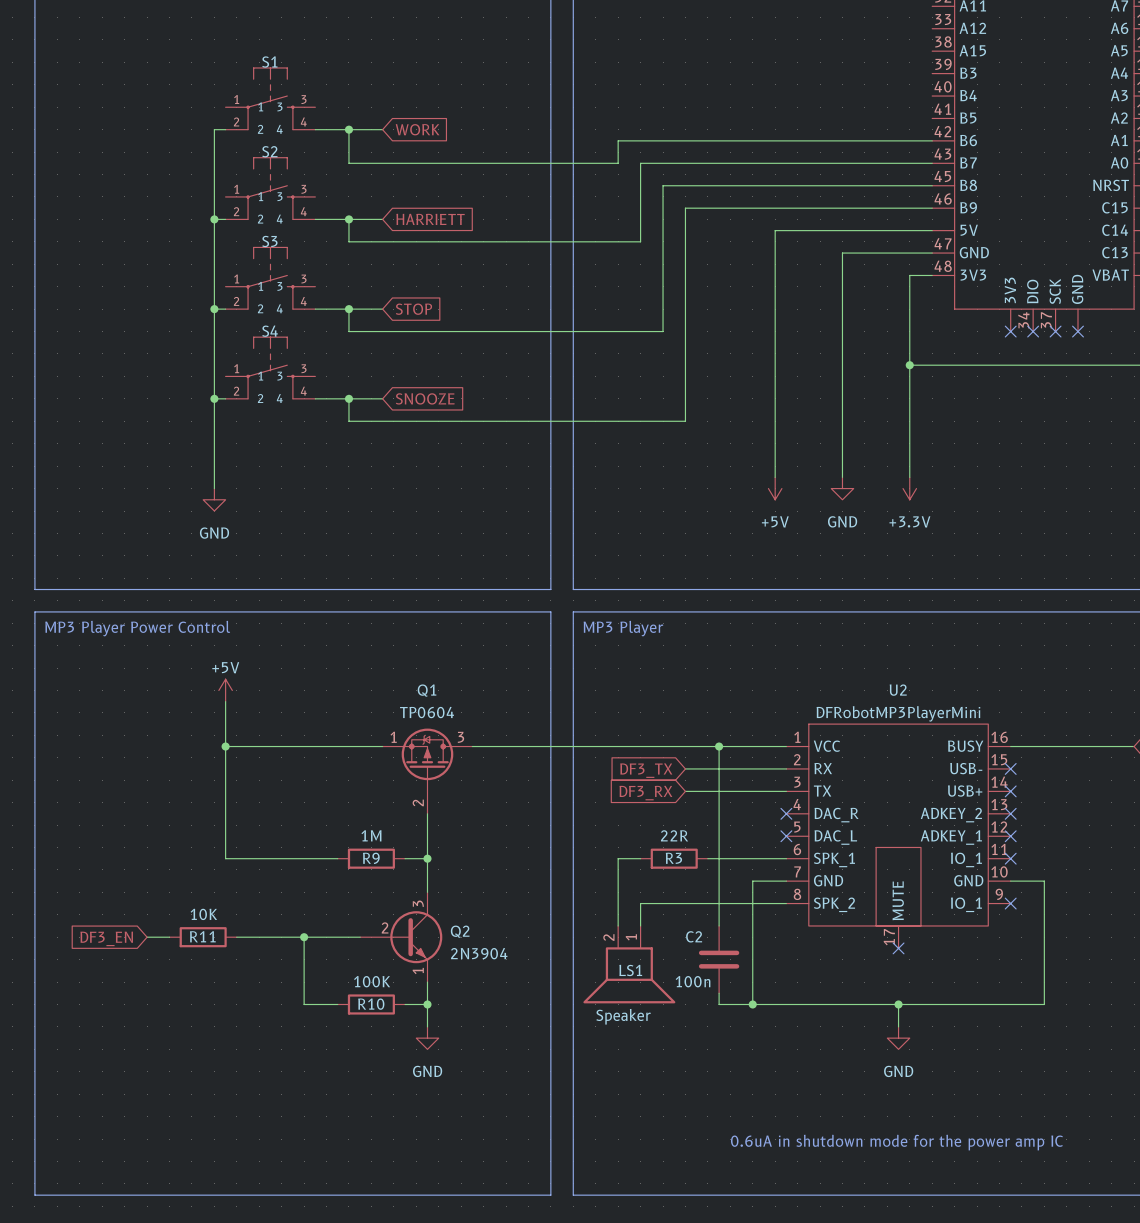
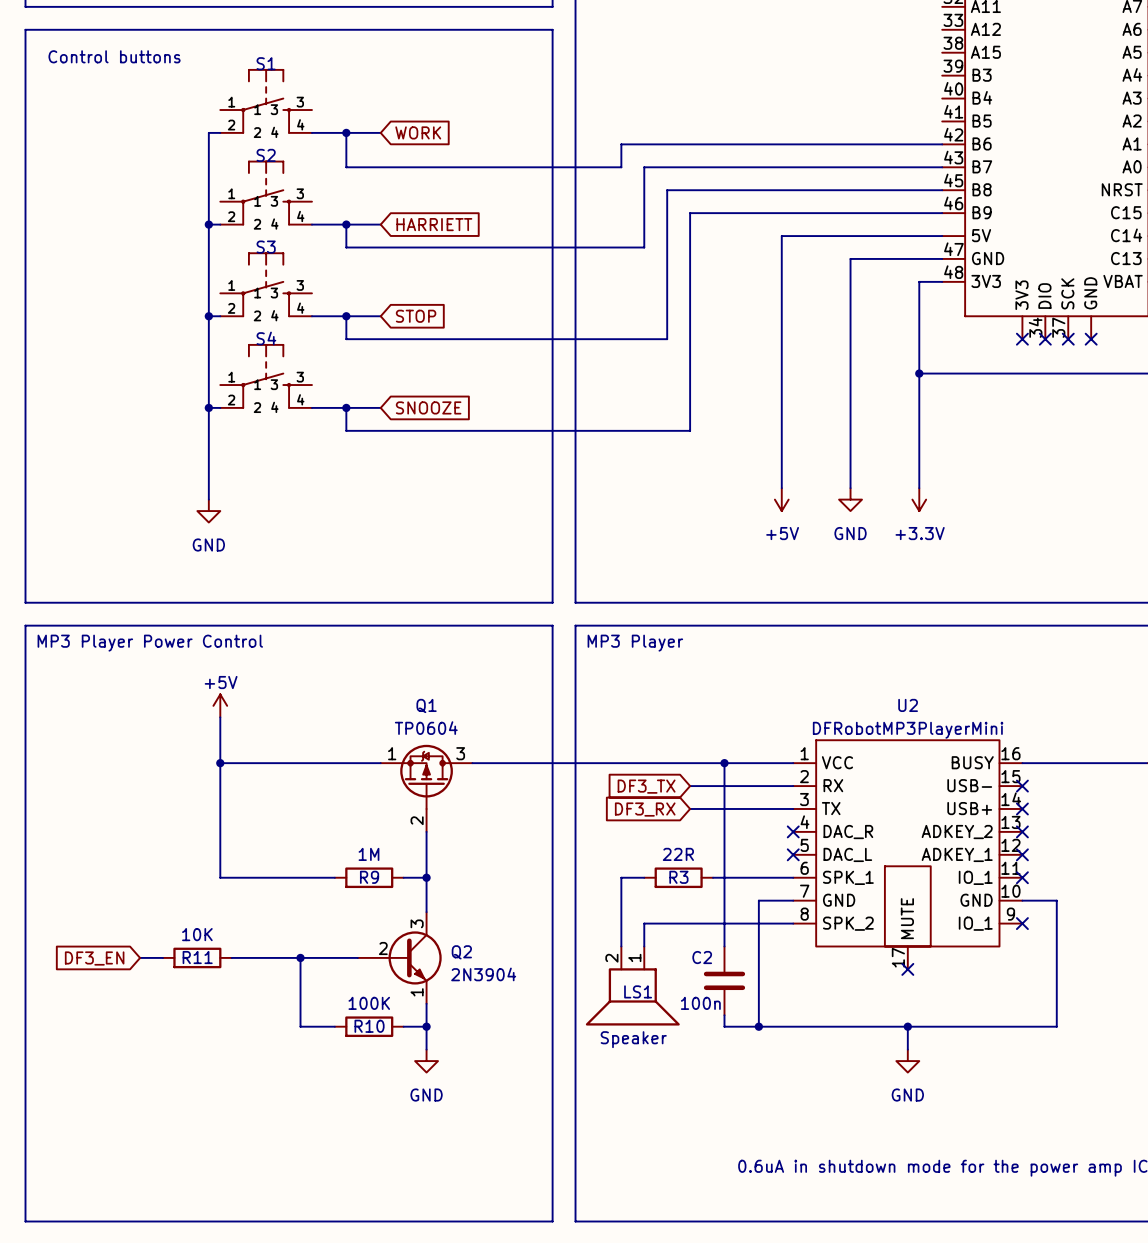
line: (34, 6) (34, 28) -> (25, 6) (552, 6)
line: (550, 6) (550, 28) -> (25, 29) (552, 29)
text: none -> Control buttons (114, 56)

